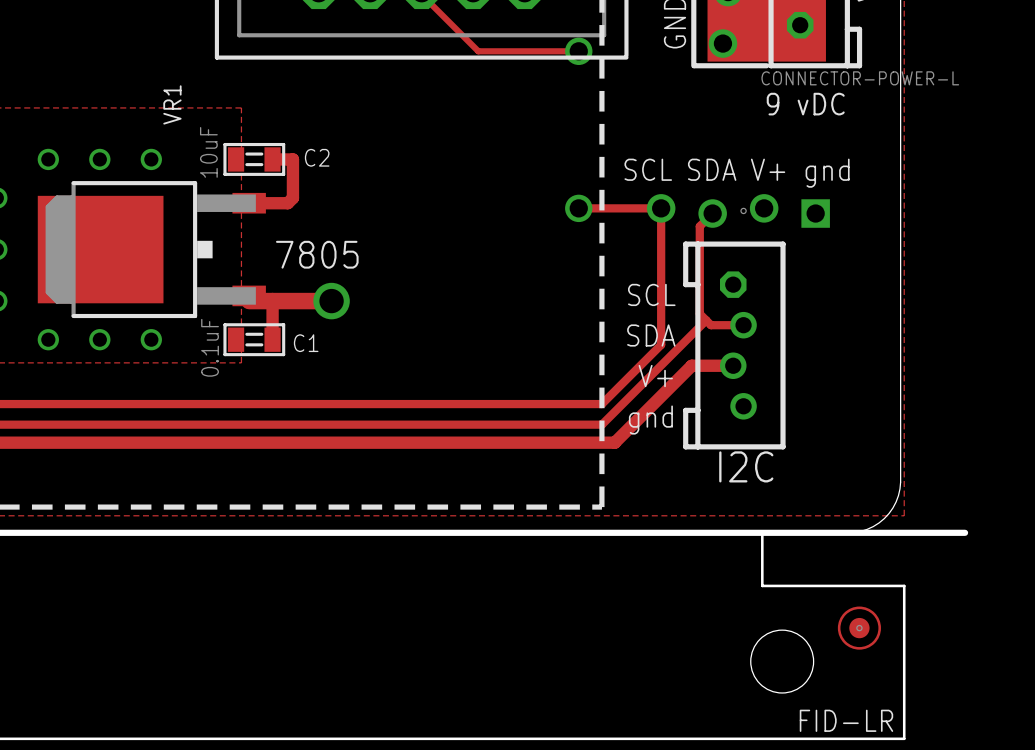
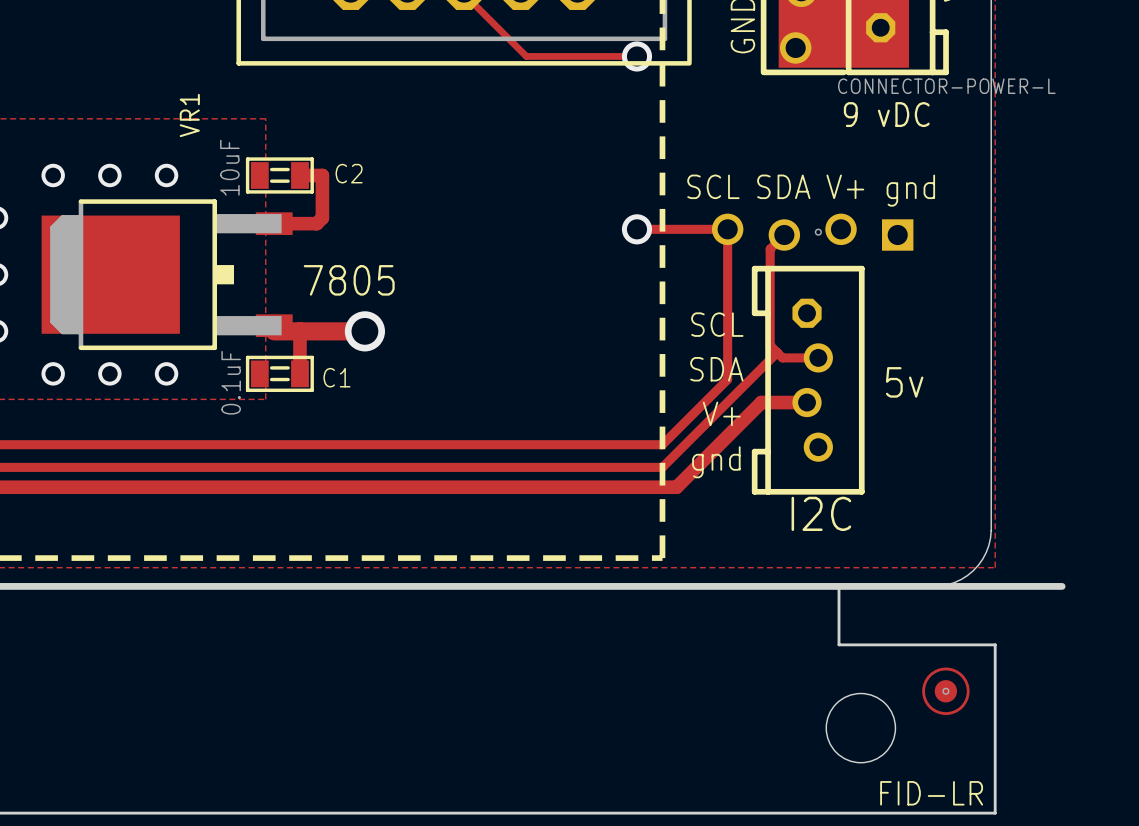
text: none -> 5v (904, 382)

